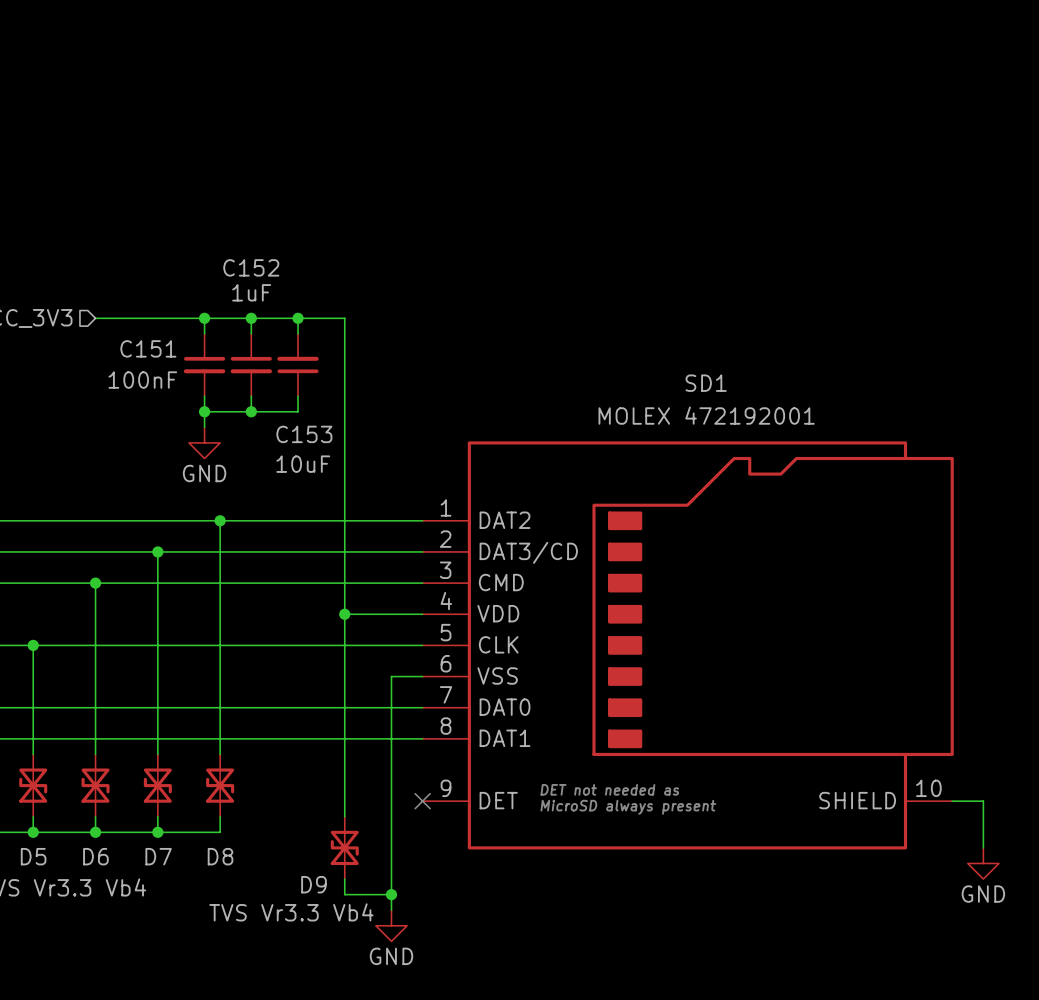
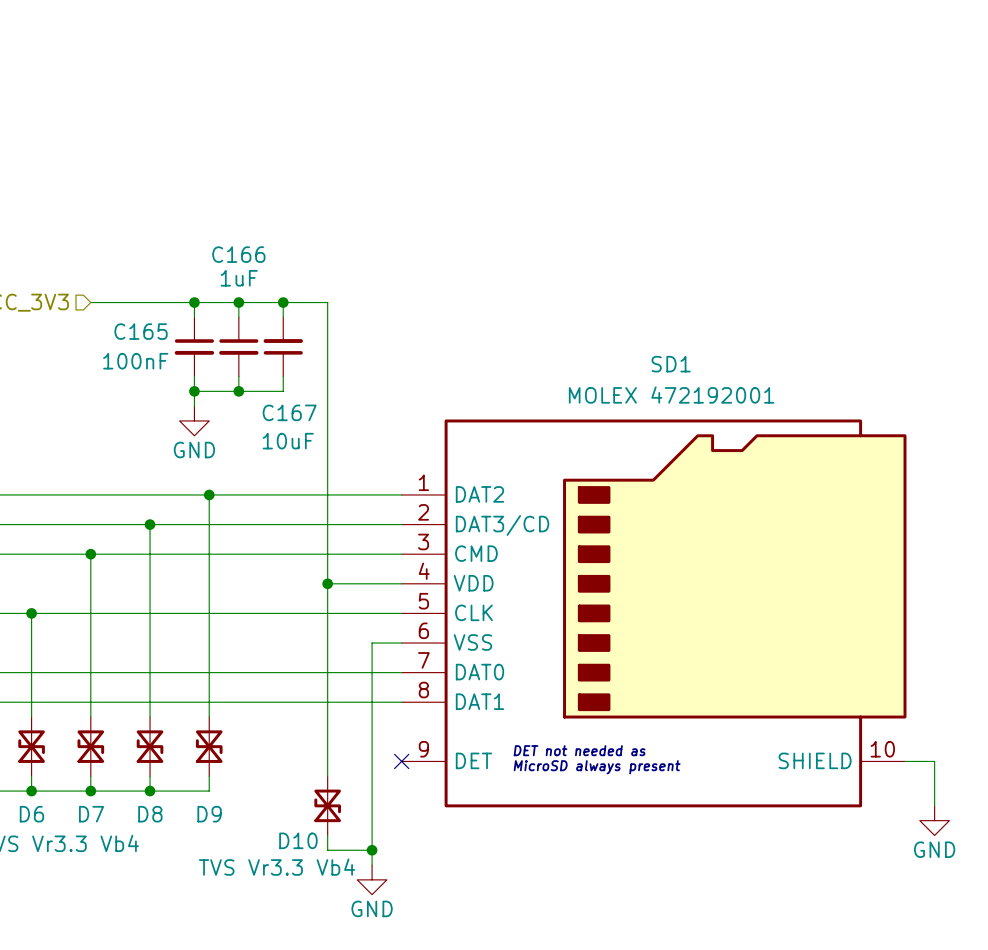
C152 name: C152 (251, 267) -> C166 (238, 254)
C151 name: C151 (148, 348) -> C165 (141, 331)
C153 name: C153 (304, 434) -> C167 (289, 412)
D5 name: D5 (33, 856) -> D6 (31, 814)
D6 name: D6 (95, 856) -> D7 (91, 814)
D7 name: D7 (158, 856) -> D8 (150, 814)
D8 name: D8 (220, 856) -> D9 (209, 814)
D9 name: D9 (313, 884) -> D10 (298, 840)

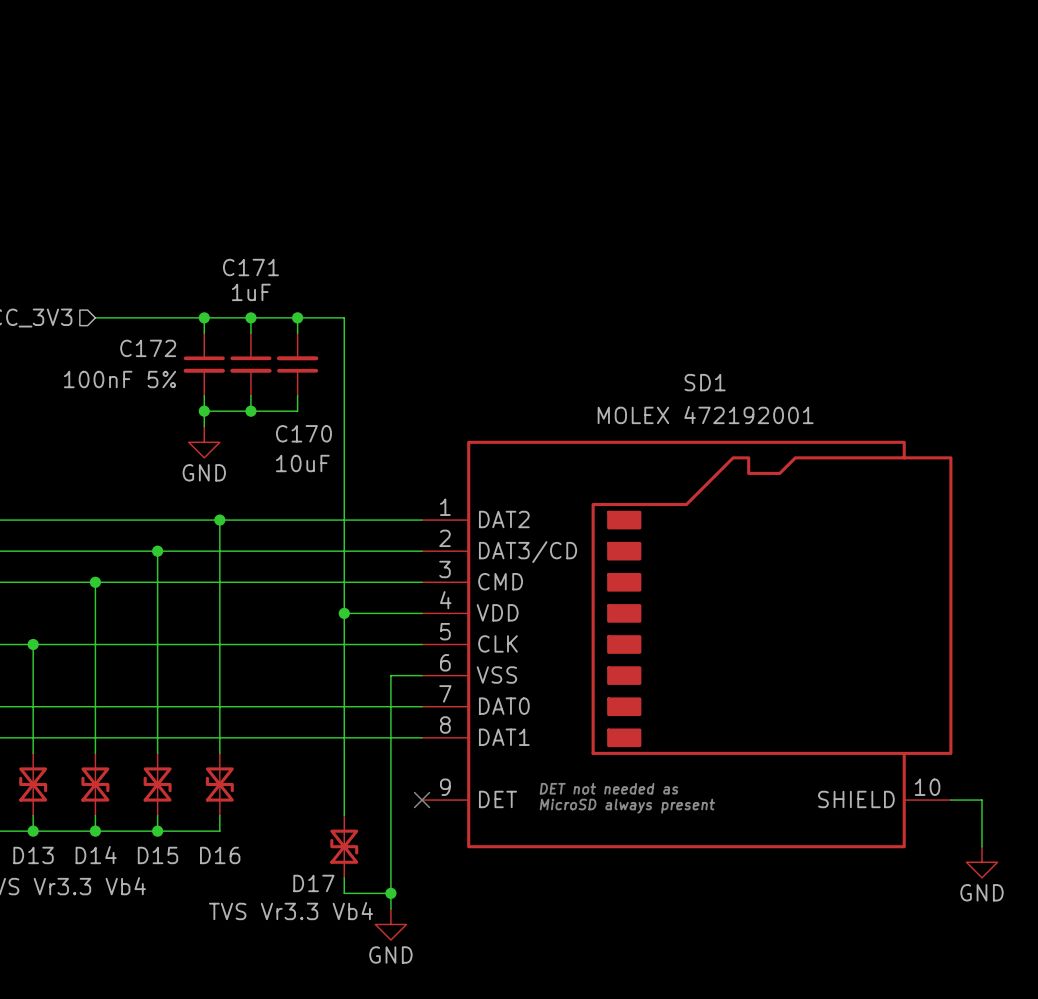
C166 name: C166 (238, 254) -> C171 (250, 267)
C165 name: C165 (141, 331) -> C172 (148, 348)
C165 value: 100nF (135, 361) -> 100nF 5% (120, 379)
C167 name: C167 (289, 412) -> C170 (303, 433)
D6 name: D6 (31, 814) -> D13 (33, 855)
D7 name: D7 (91, 814) -> D14 (96, 855)
D8 name: D8 (150, 814) -> D15 (157, 855)
D9 name: D9 (209, 814) -> D16 (220, 855)
D10 name: D10 (298, 840) -> D17 (313, 883)

